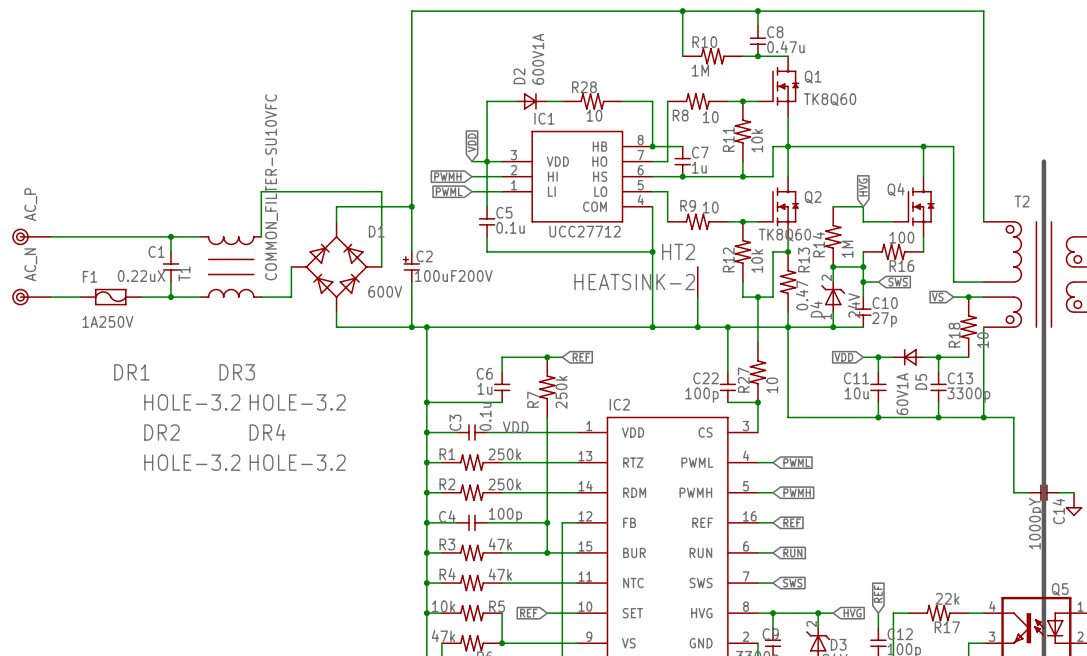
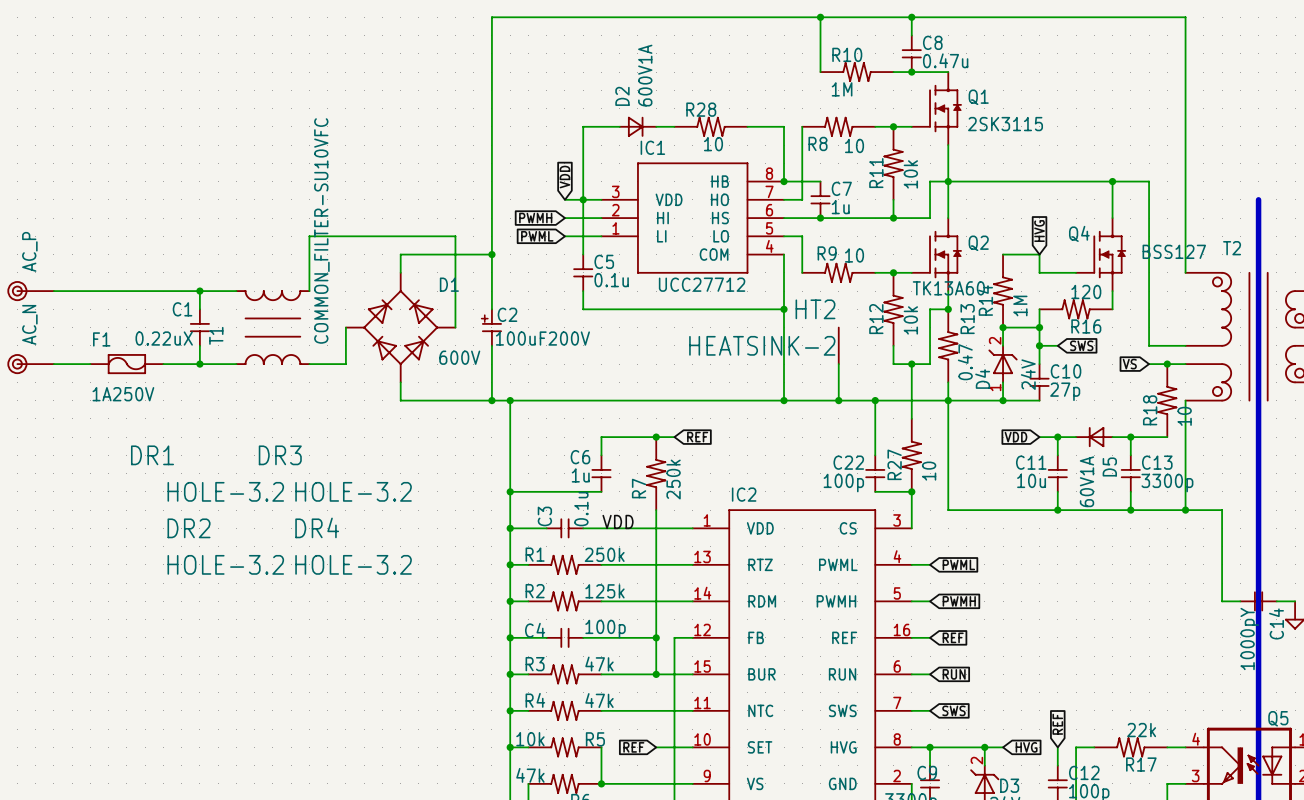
Q1 value: TK8Q60 (830, 99) -> 2SK3115 (1005, 124)
Q4 value: none -> BSS127 (1174, 251)
Q2 value: TK8Q60 (784, 235) -> TK13A60 (948, 288)
R16 value: 100 (901, 237) -> 120 (1086, 291)
R2 value: 250k (504, 484) -> 125k (604, 591)

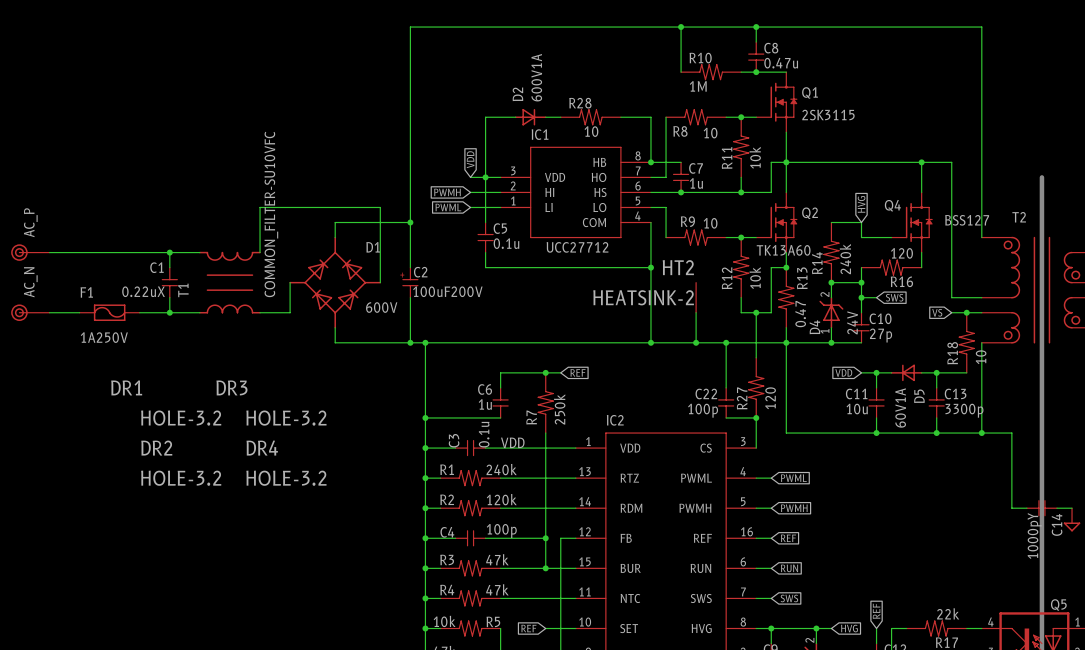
R14 value: 1M (1020, 306) -> 240k (845, 259)
R27 value: 10 (929, 471) -> 120 (770, 398)
R1 value: 250k (604, 554) -> 240k (501, 469)
R2 value: 125k (604, 591) -> 120k (501, 499)

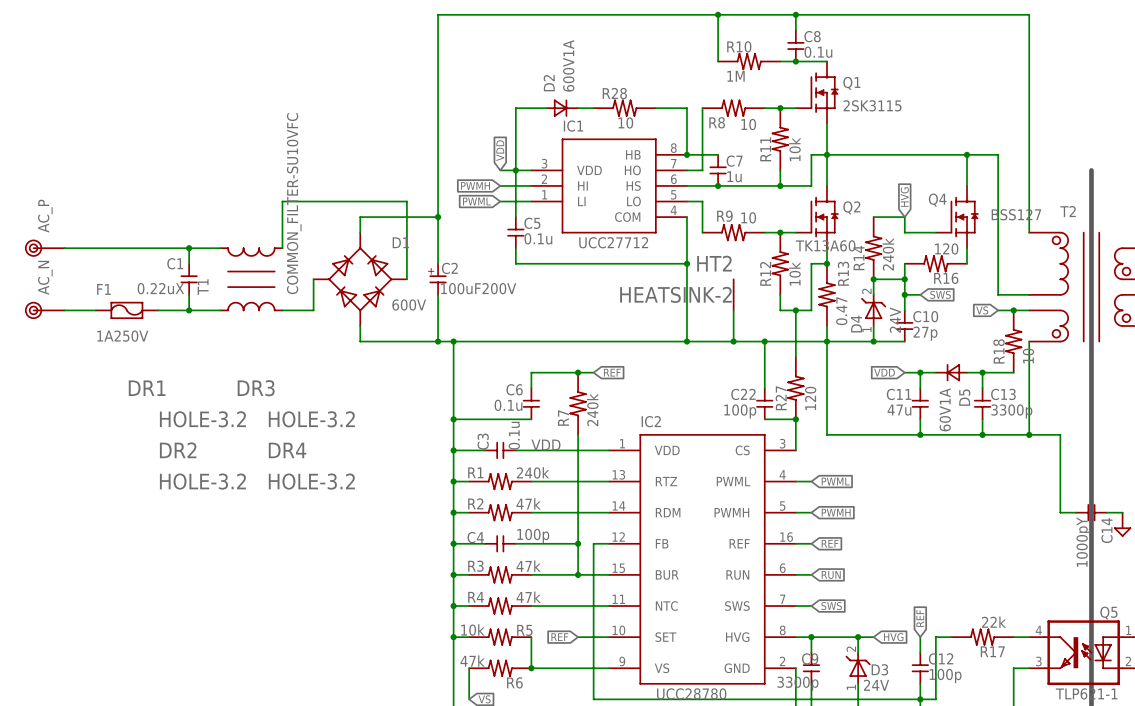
C8 value: 0.47u (781, 63) -> 0.1u (818, 52)
C6 value: 1u (485, 404) -> 0.1u (508, 405)
R7 value: 250k (559, 409) -> 240k (592, 409)
C11 value: 10u (857, 409) -> 47u (899, 410)
R2 value: 120k (501, 499) -> 47k (528, 503)

